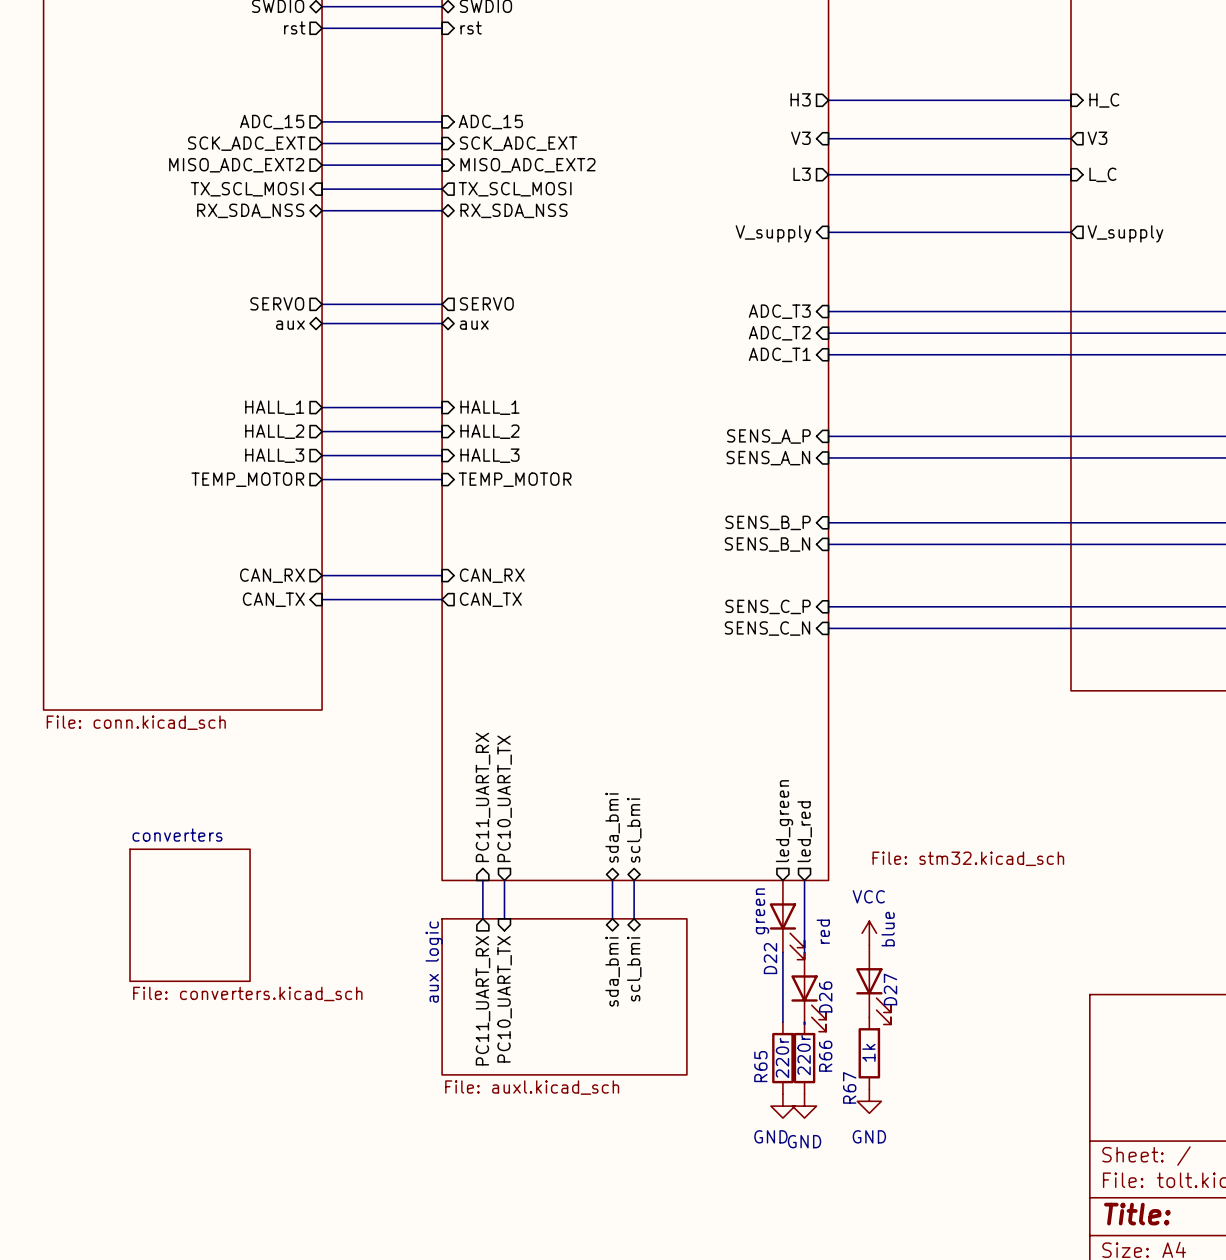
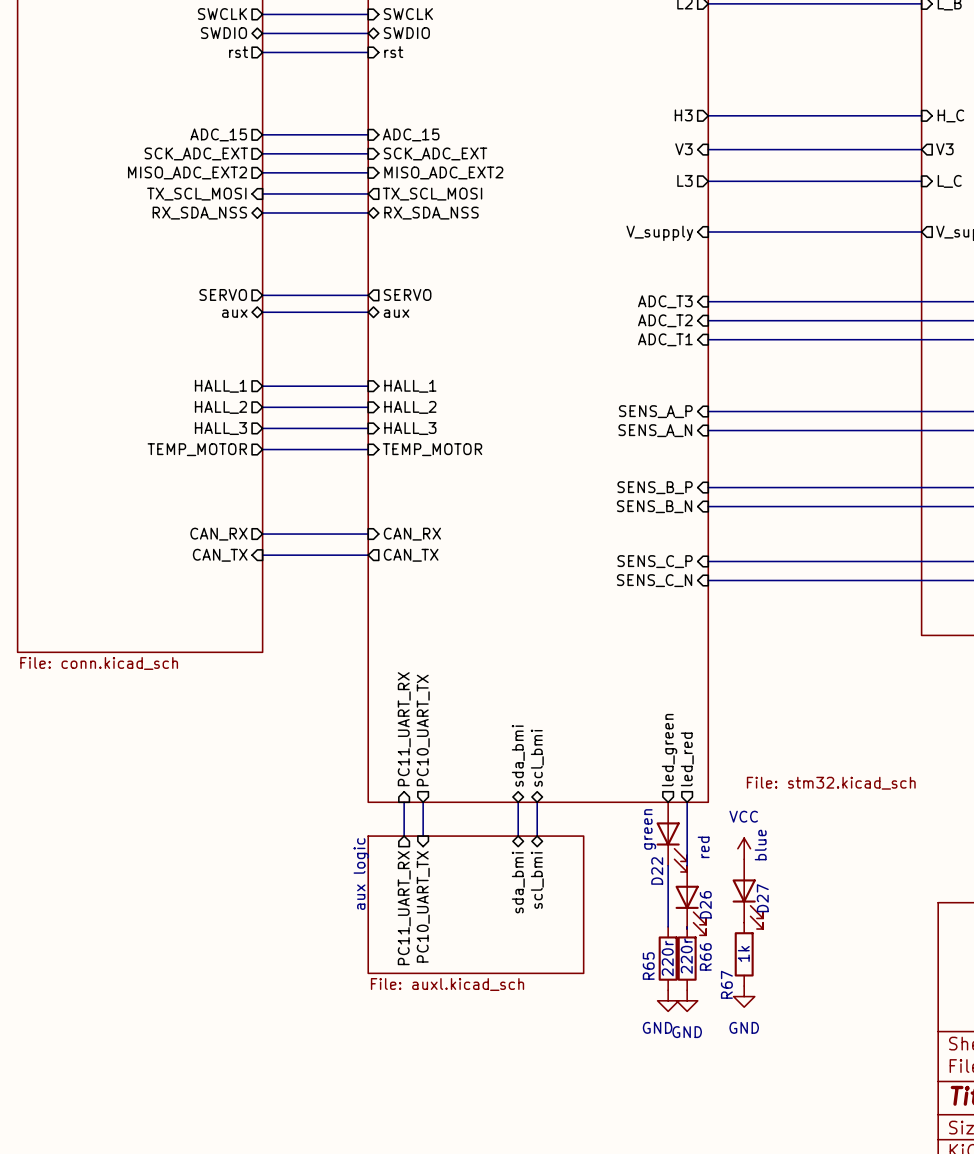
sheet converters: File: converters.kicad_sch (190, 915) -> none

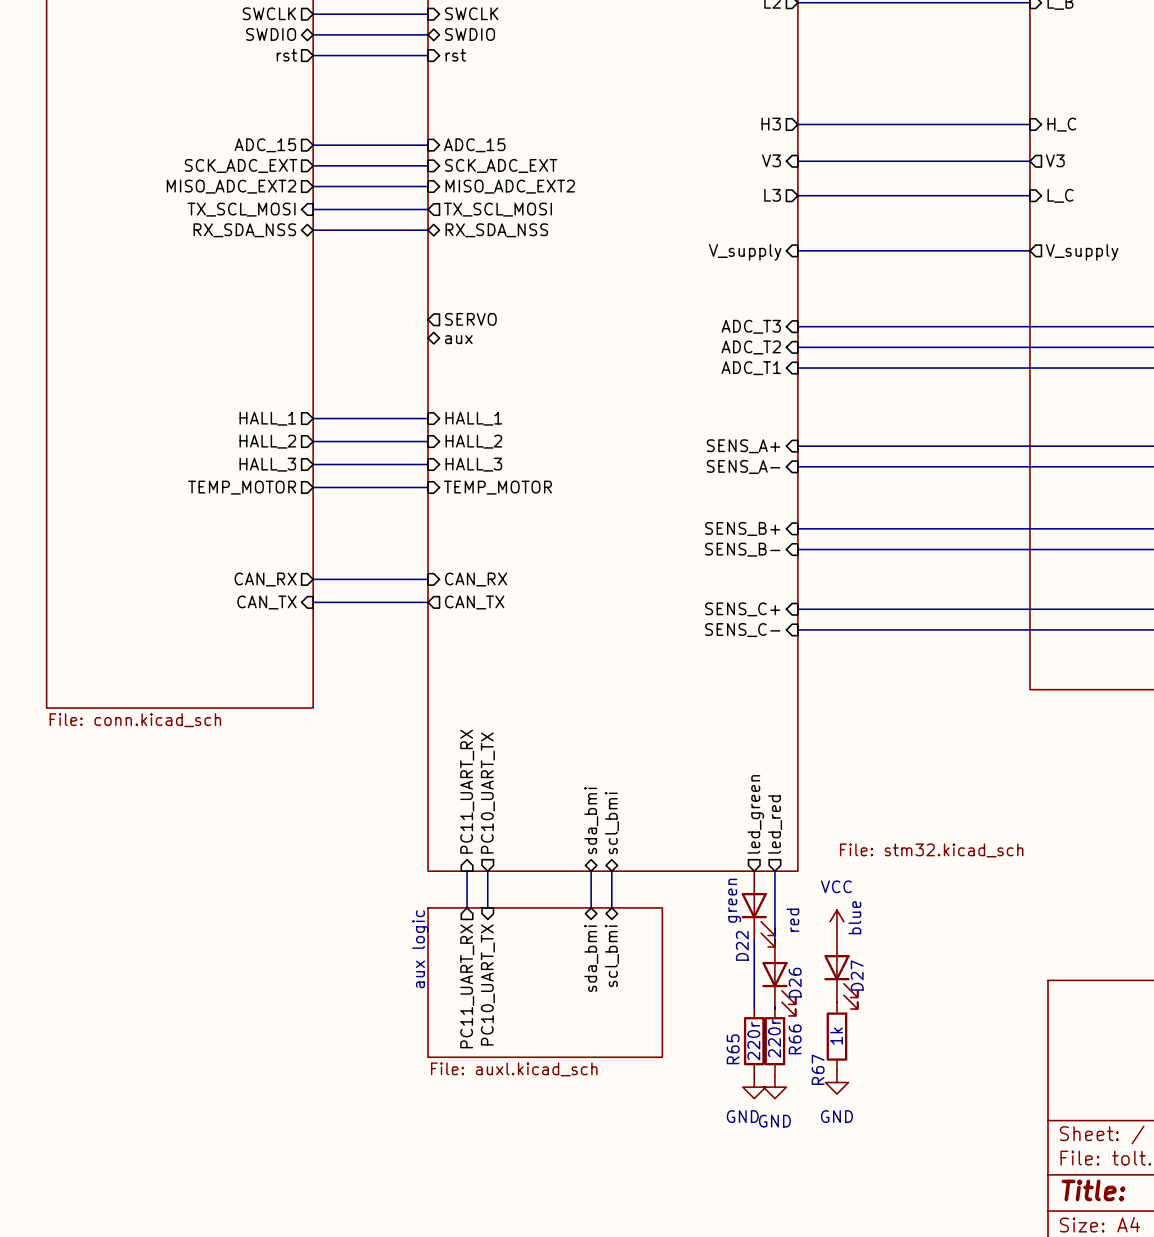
sheet pin: SERVO (223, 294) -> none
wire: (262, 295) (368, 295) -> none
wire: (262, 312) (368, 312) -> none
sheet pin: aux (234, 313) -> none
sheet pin: SENS_A_P (655, 411) -> SENS_A+ (743, 446)
sheet pin: SENS_A_N (655, 430) -> SENS_A- (743, 466)
sheet pin: SENS_B_P (655, 487) -> SENS_B+ (742, 528)
sheet pin: SENS_B_N (654, 506) -> SENS_B- (742, 549)
sheet pin: SENS_C_P (655, 561) -> SENS_C+ (742, 609)
sheet pin: SENS_C_N (654, 580) -> SENS_C- (742, 630)

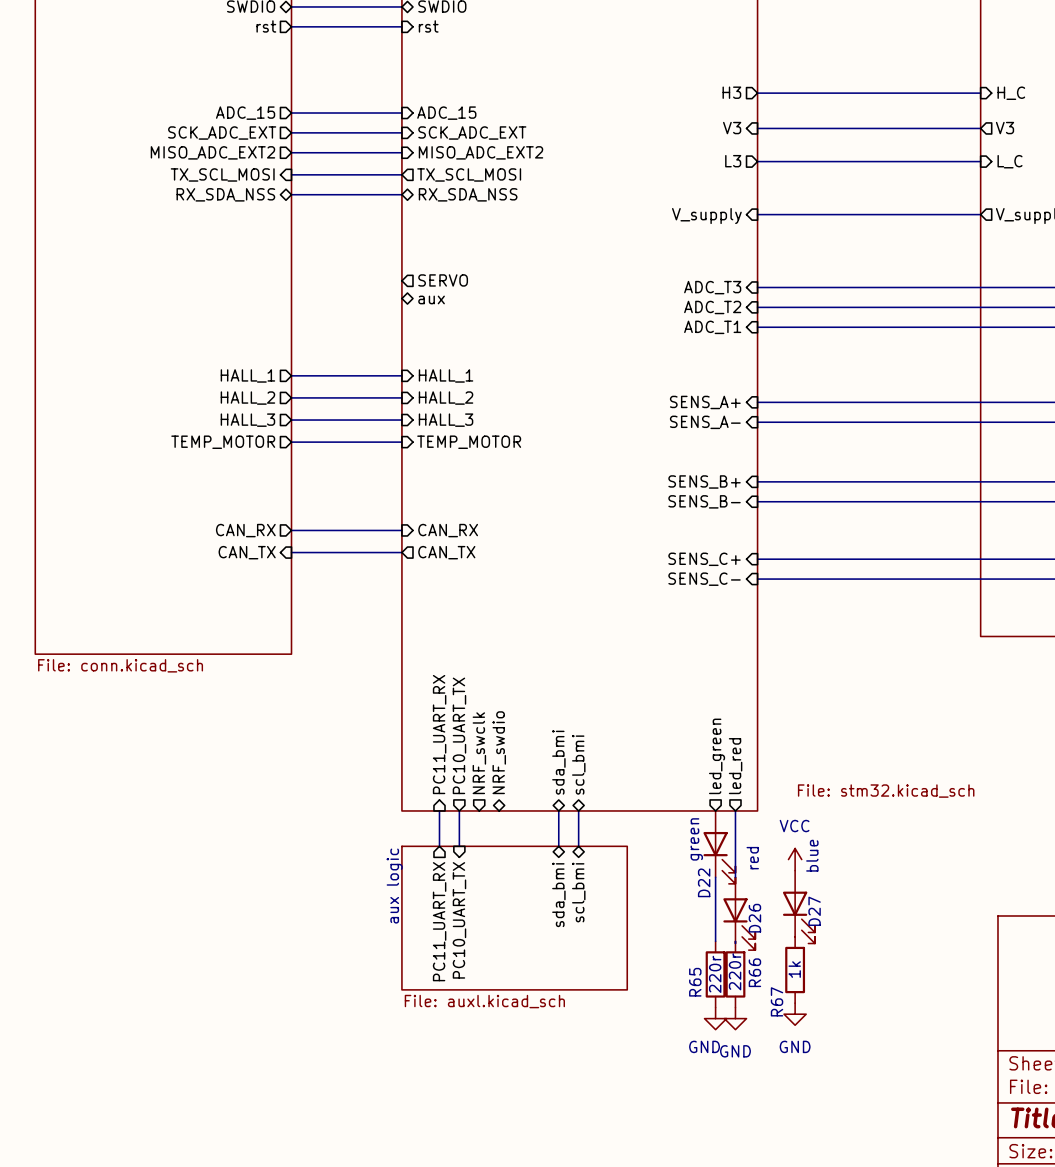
sheet pin: none -> NRF_swdio (499, 752)
sheet pin: none -> NRF_swclk (479, 753)

